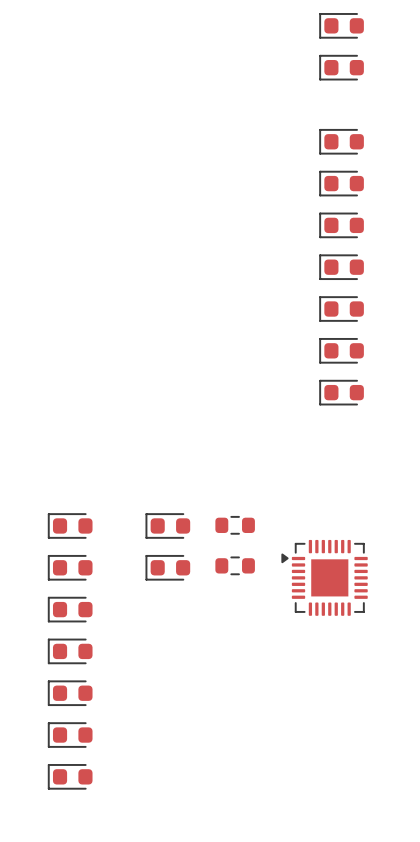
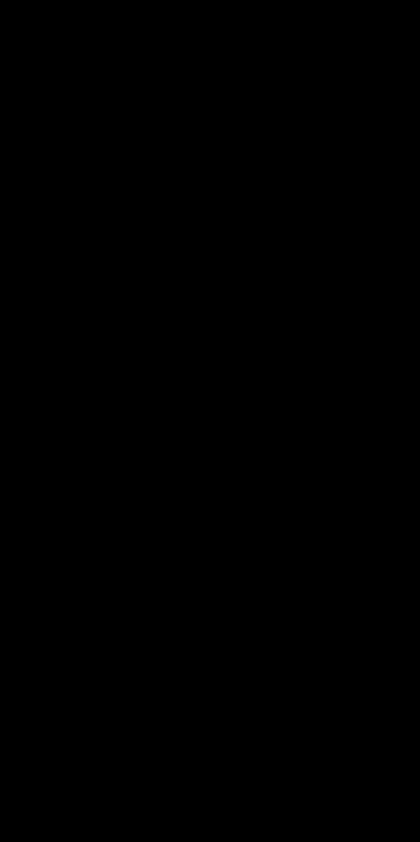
part: (341, 25) -> none
part: (341, 67) -> none
part: (341, 141) -> none
part: (341, 183) -> none
part: (341, 225) -> none
part: (341, 267) -> none
part: (341, 309) -> none
part: (341, 350) -> none
part: (341, 392) -> none
part: (70, 525) -> none
part: (167, 525) -> none
part: (235, 525) -> none
part: (235, 565) -> none
part: (70, 567) -> none
part: (167, 567) -> none
part: (324, 577) -> none
part: (70, 609) -> none
part: (70, 651) -> none
part: (70, 693) -> none
part: (70, 735) -> none
part: (70, 776) -> none

